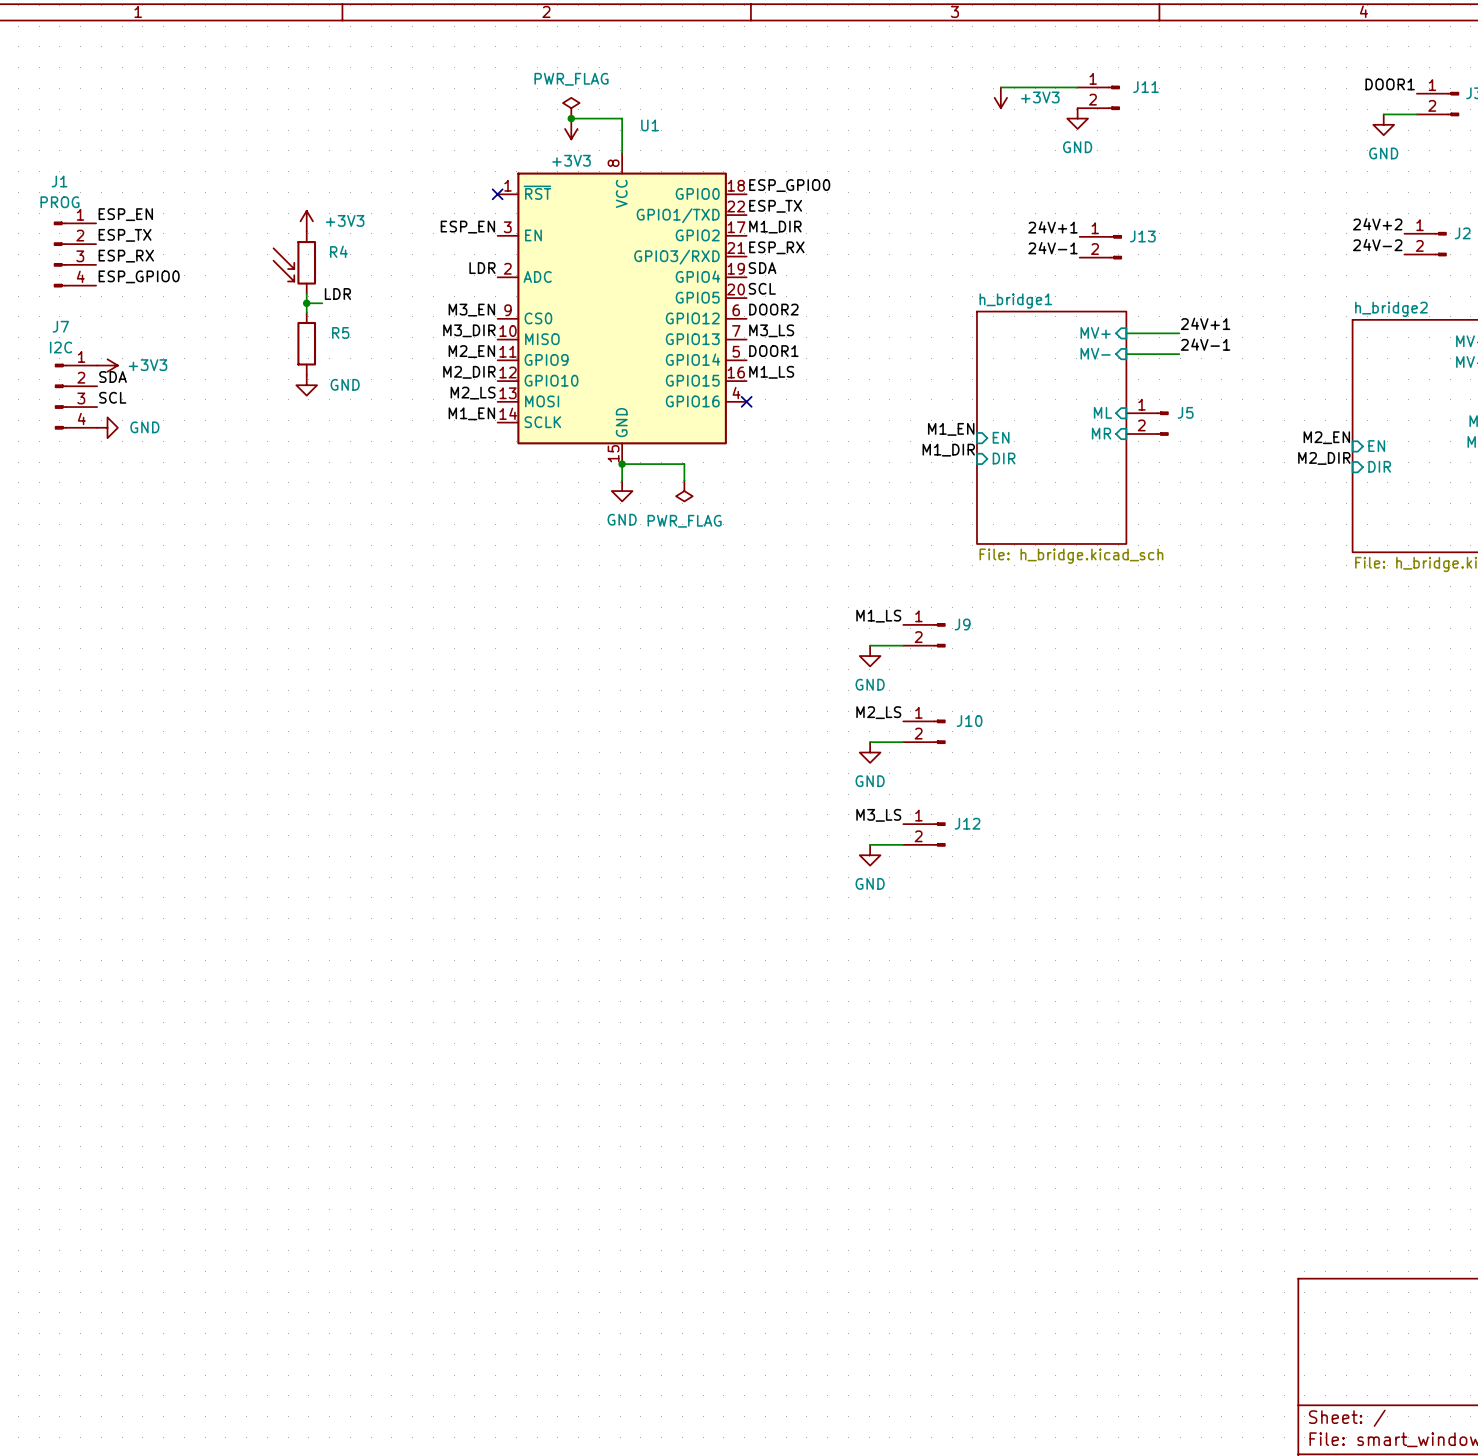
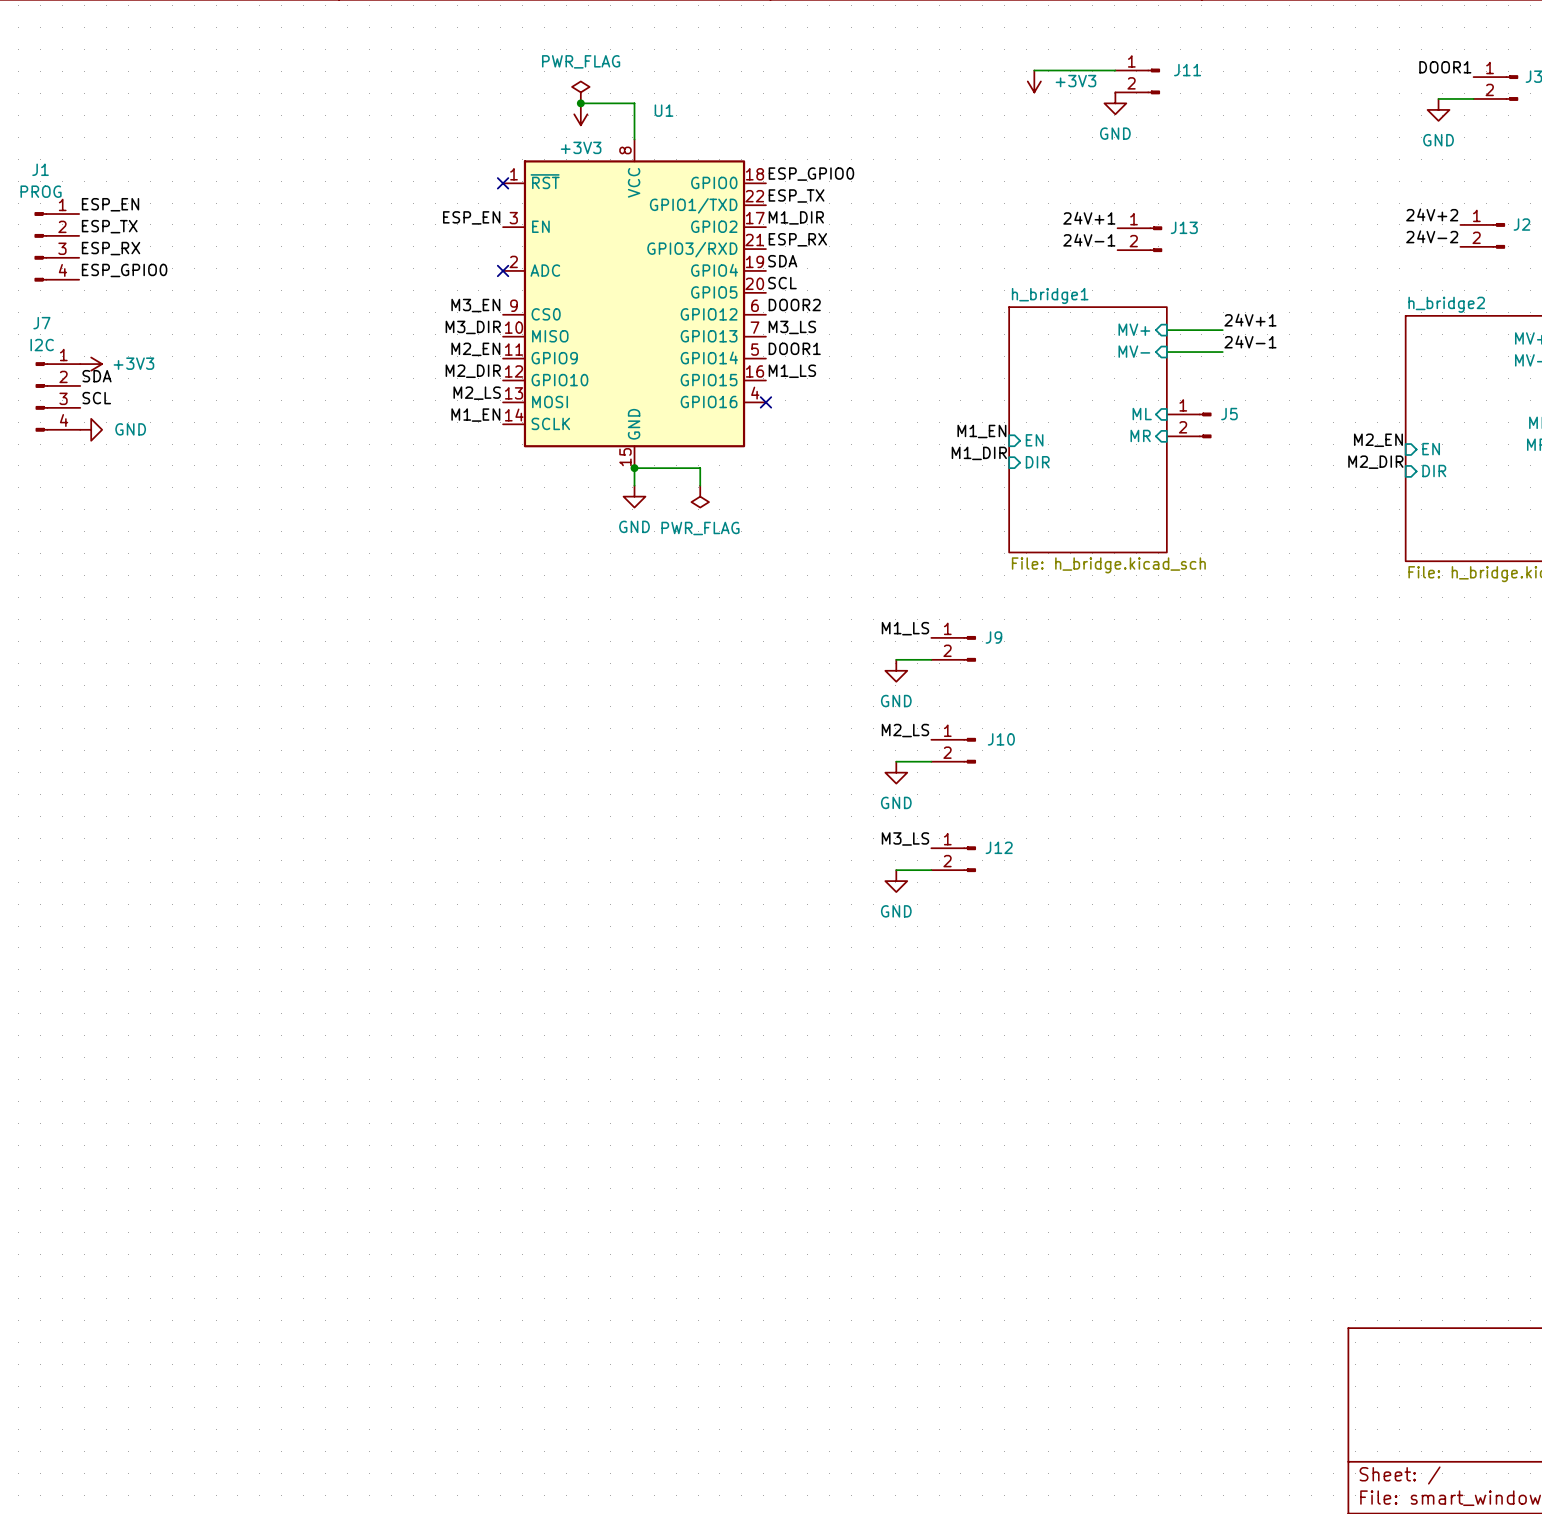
power symbol: +3V3 (306, 221) -> none
R4: (294, 262) -> none
label: LDR (482, 268) -> none
no-connect mark: none -> (503, 270)
wire: (306, 293) (306, 312) -> none
label: LDR (337, 294) -> none
wire: (306, 303) (322, 303) -> none
junction: (306, 303) -> none
R5: (306, 343) -> none
power symbol: GND (306, 385) -> none

